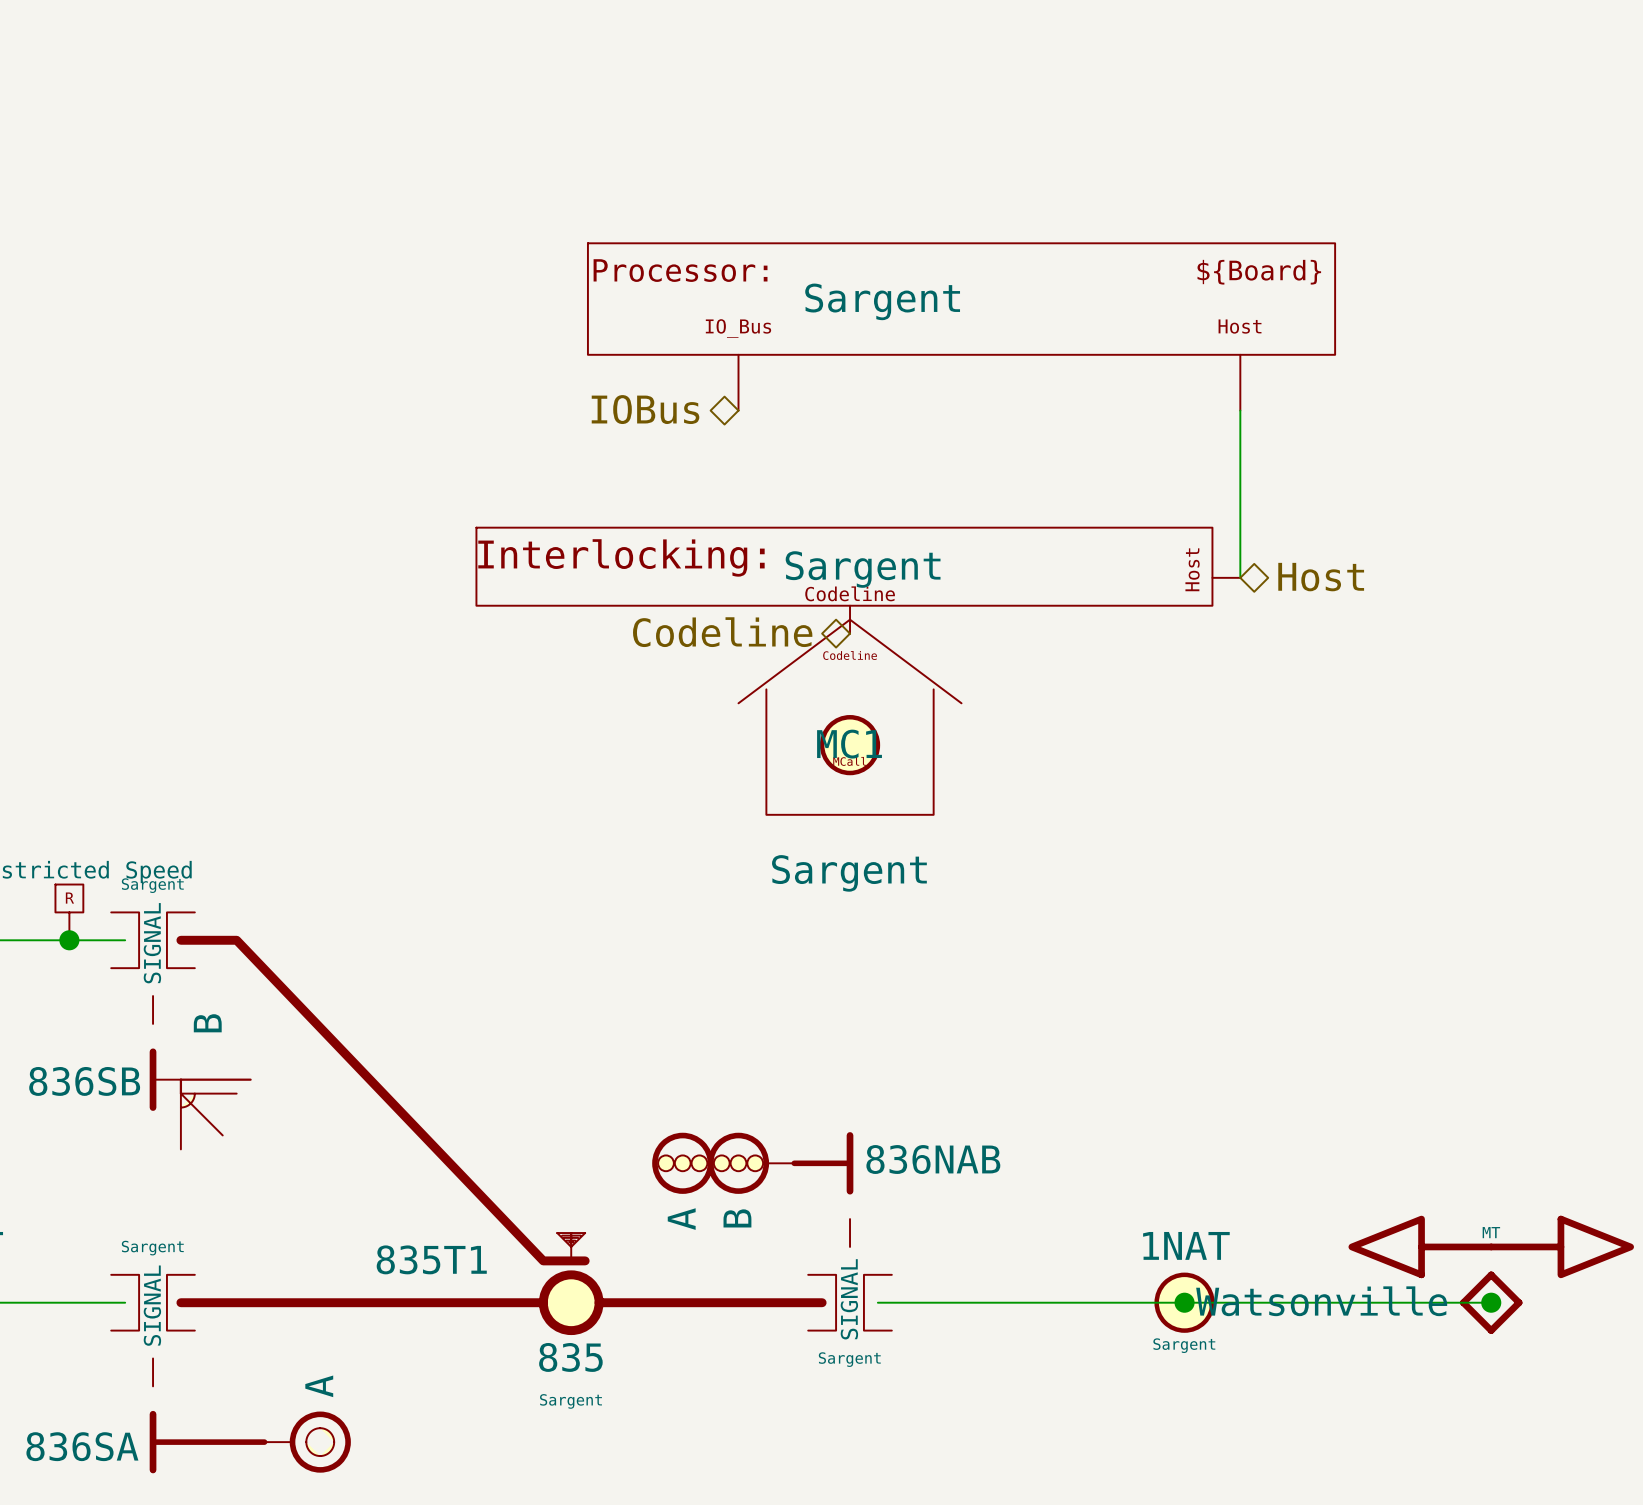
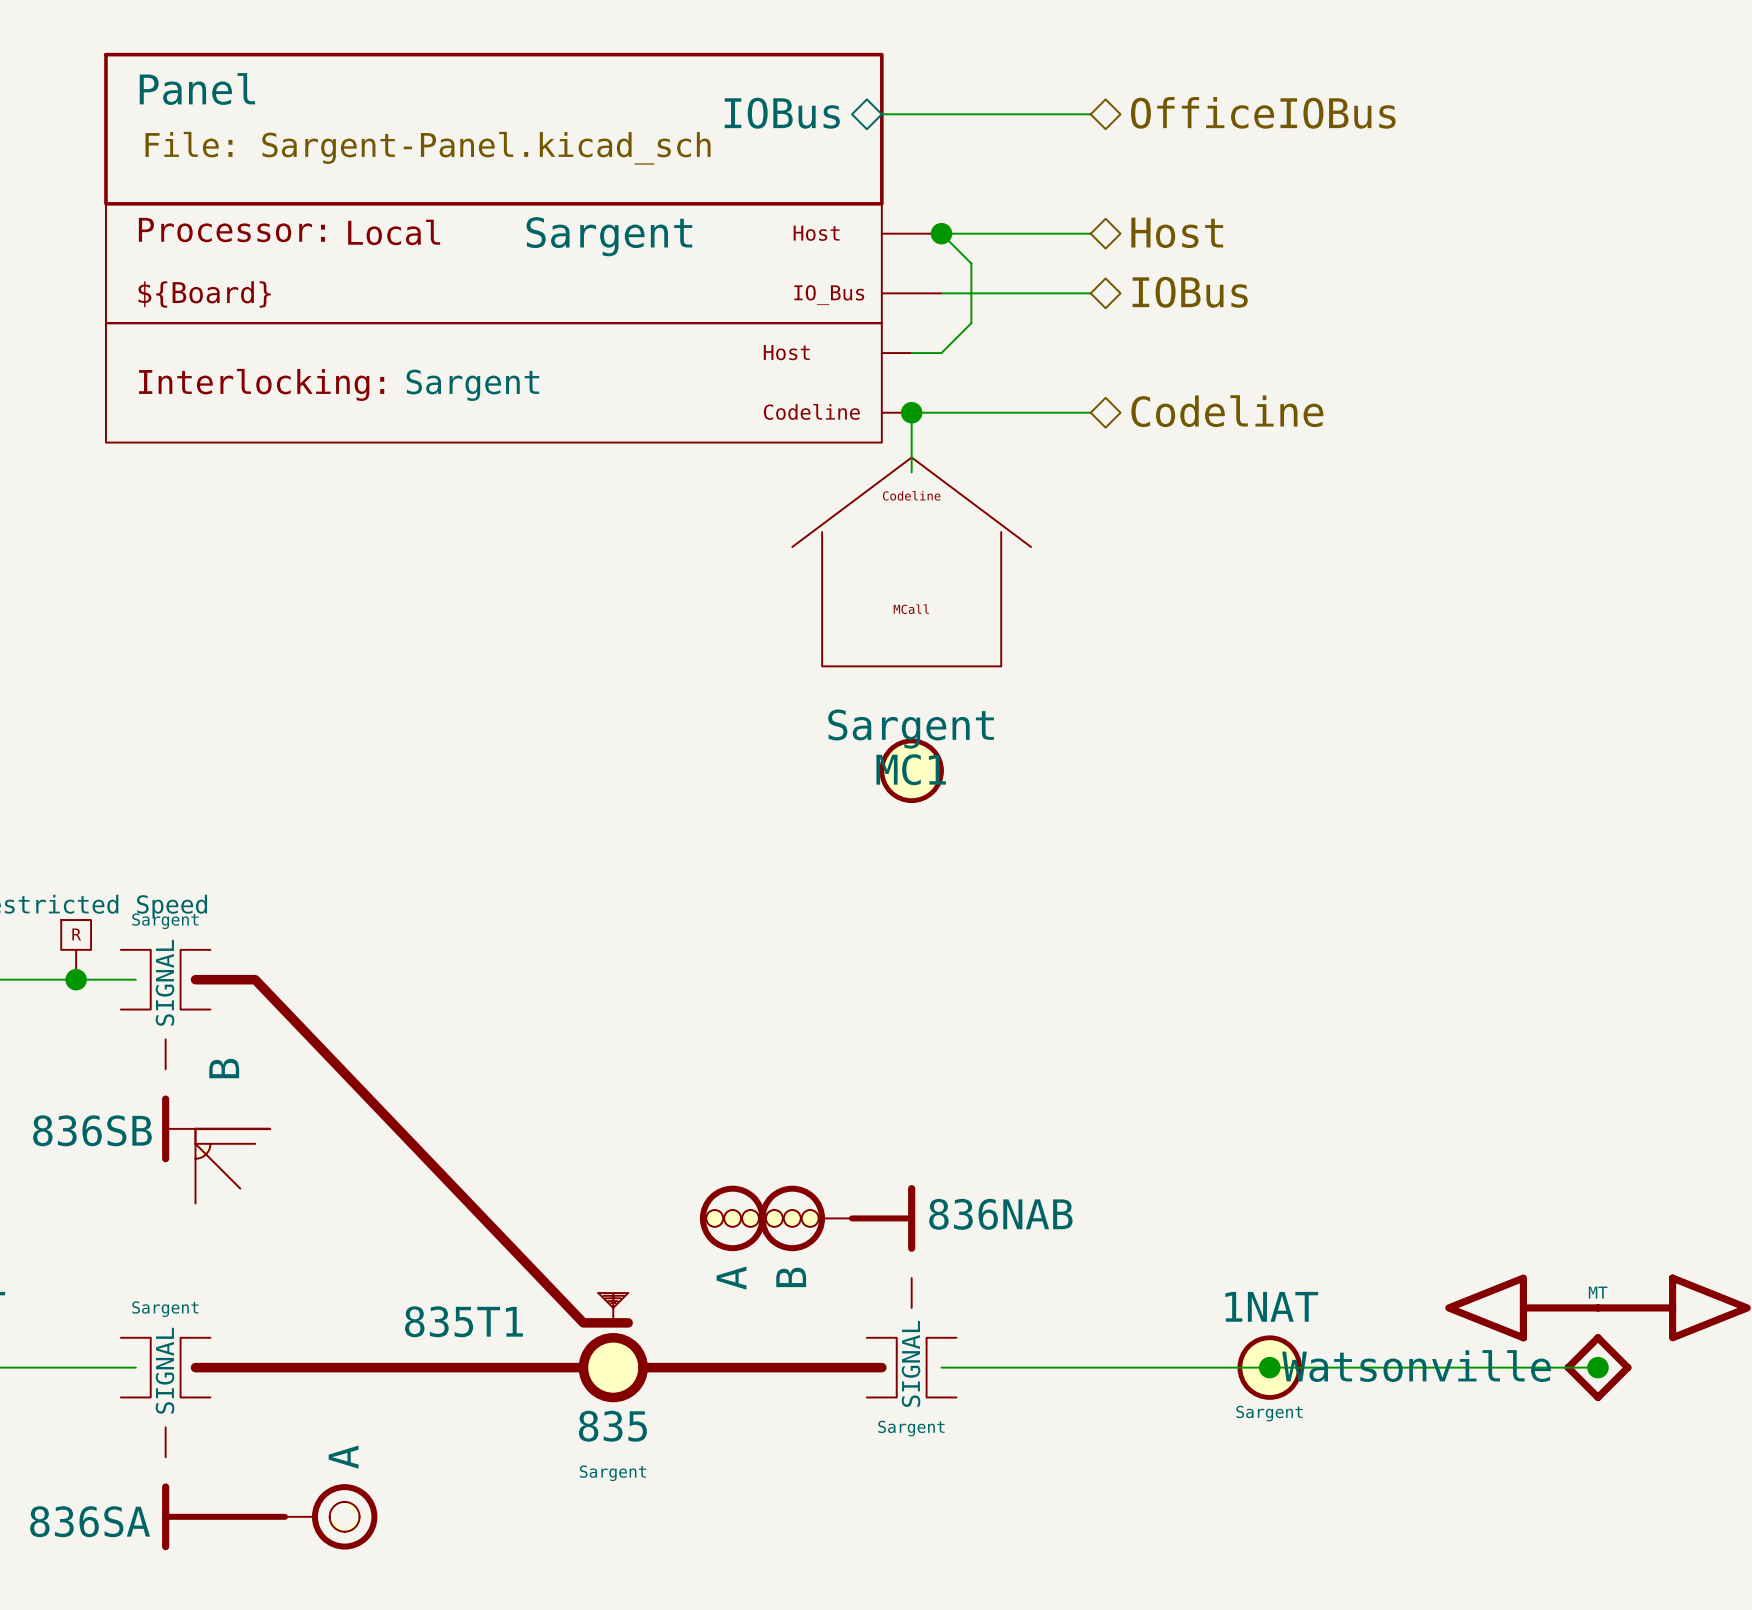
sheet pin: none -> IOBus (782, 113)
hierarchical label: none -> OfficeIOBus (1263, 112)
wire: none -> (881, 114) (1090, 114)
sheet Panel: none -> File: Sargent-Panel.kicad_sch (493, 129)
junction: none -> (941, 233)
wire: none -> (1090, 233) (941, 233) (971, 263) (971, 323) (941, 353) (911, 353)
part: none -> Sargent (523, 263)
wire: none -> (941, 293) (1090, 293)
part: Sargent (961, 326) -> none
part: none -> (508, 382)
hierarchical label rotation: 0° (645, 409) -> 180° (1190, 292)
hierarchical label position: IOBus (645, 409) -> IOBus (1190, 292)
junction: none -> (911, 412)
wire: none -> (1090, 412) (911, 412) (911, 472)
wire: (1240, 410) (1240, 577) -> none
hierarchical label position: Host (1321, 577) -> Host (1177, 232)
part: Sargent (858, 580) -> none
hierarchical label rotation: 0° (722, 632) -> 180° (1227, 411)
hierarchical label position: Codeline (722, 632) -> Codeline (1227, 411)
part position: (850, 717) -> (911, 561)

